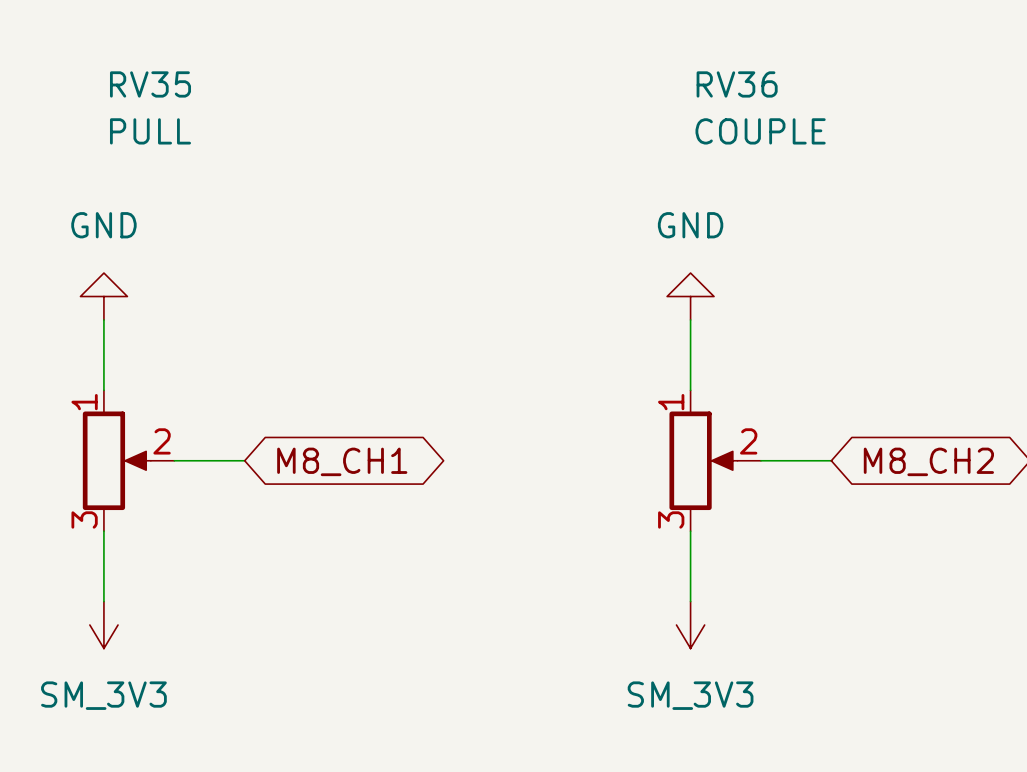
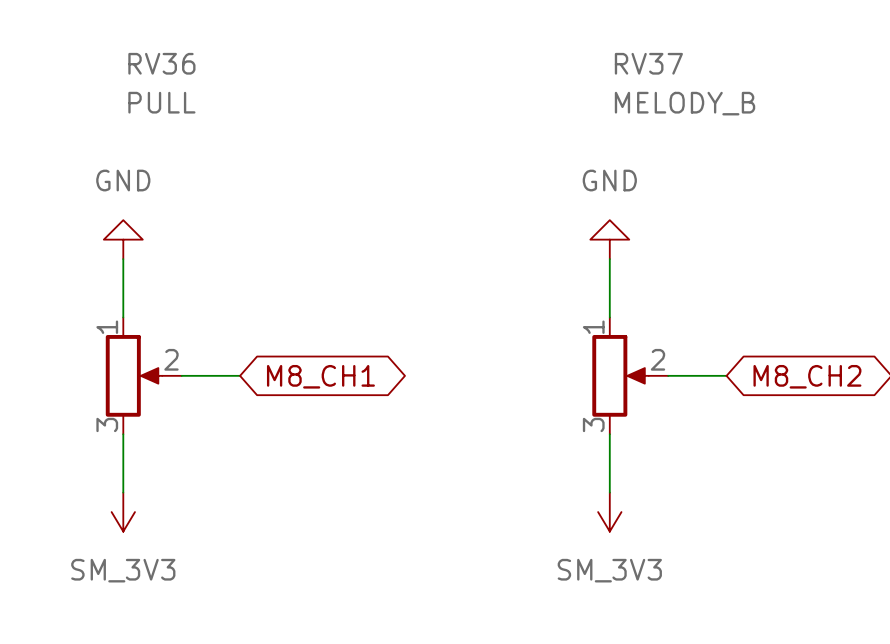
RV35 name: RV35 (150, 84) -> RV36 (161, 63)
RV36 name: RV36 (737, 84) -> RV37 (648, 63)
RV36 value: COUPLE (760, 131) -> MELODY_B (685, 103)

